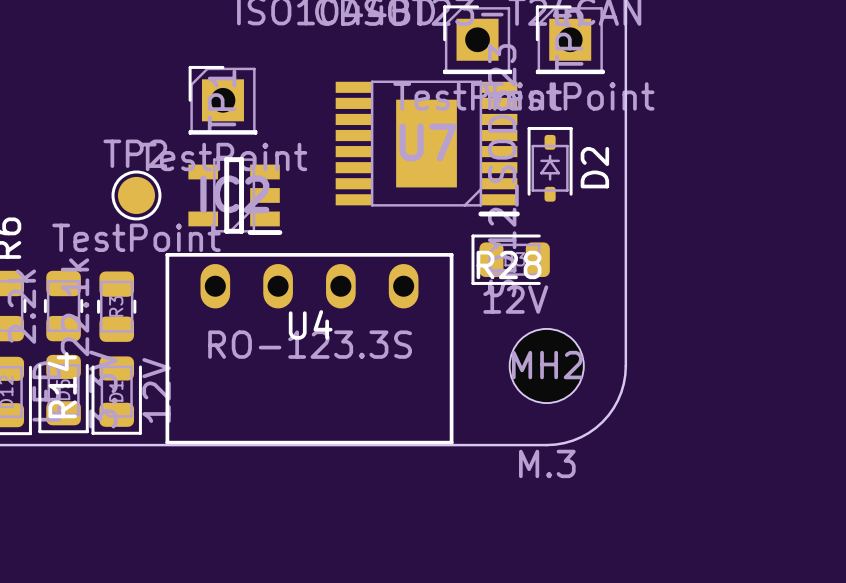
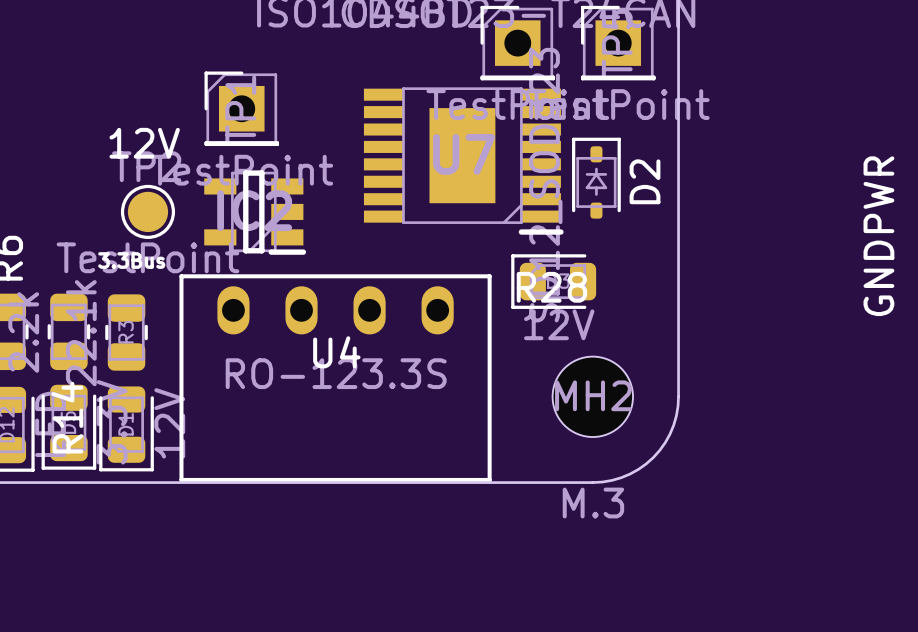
text: none -> 12V (144, 143)
text: none -> GNDPWR (878, 236)
text: none -> 3.3Bus (131, 260)

